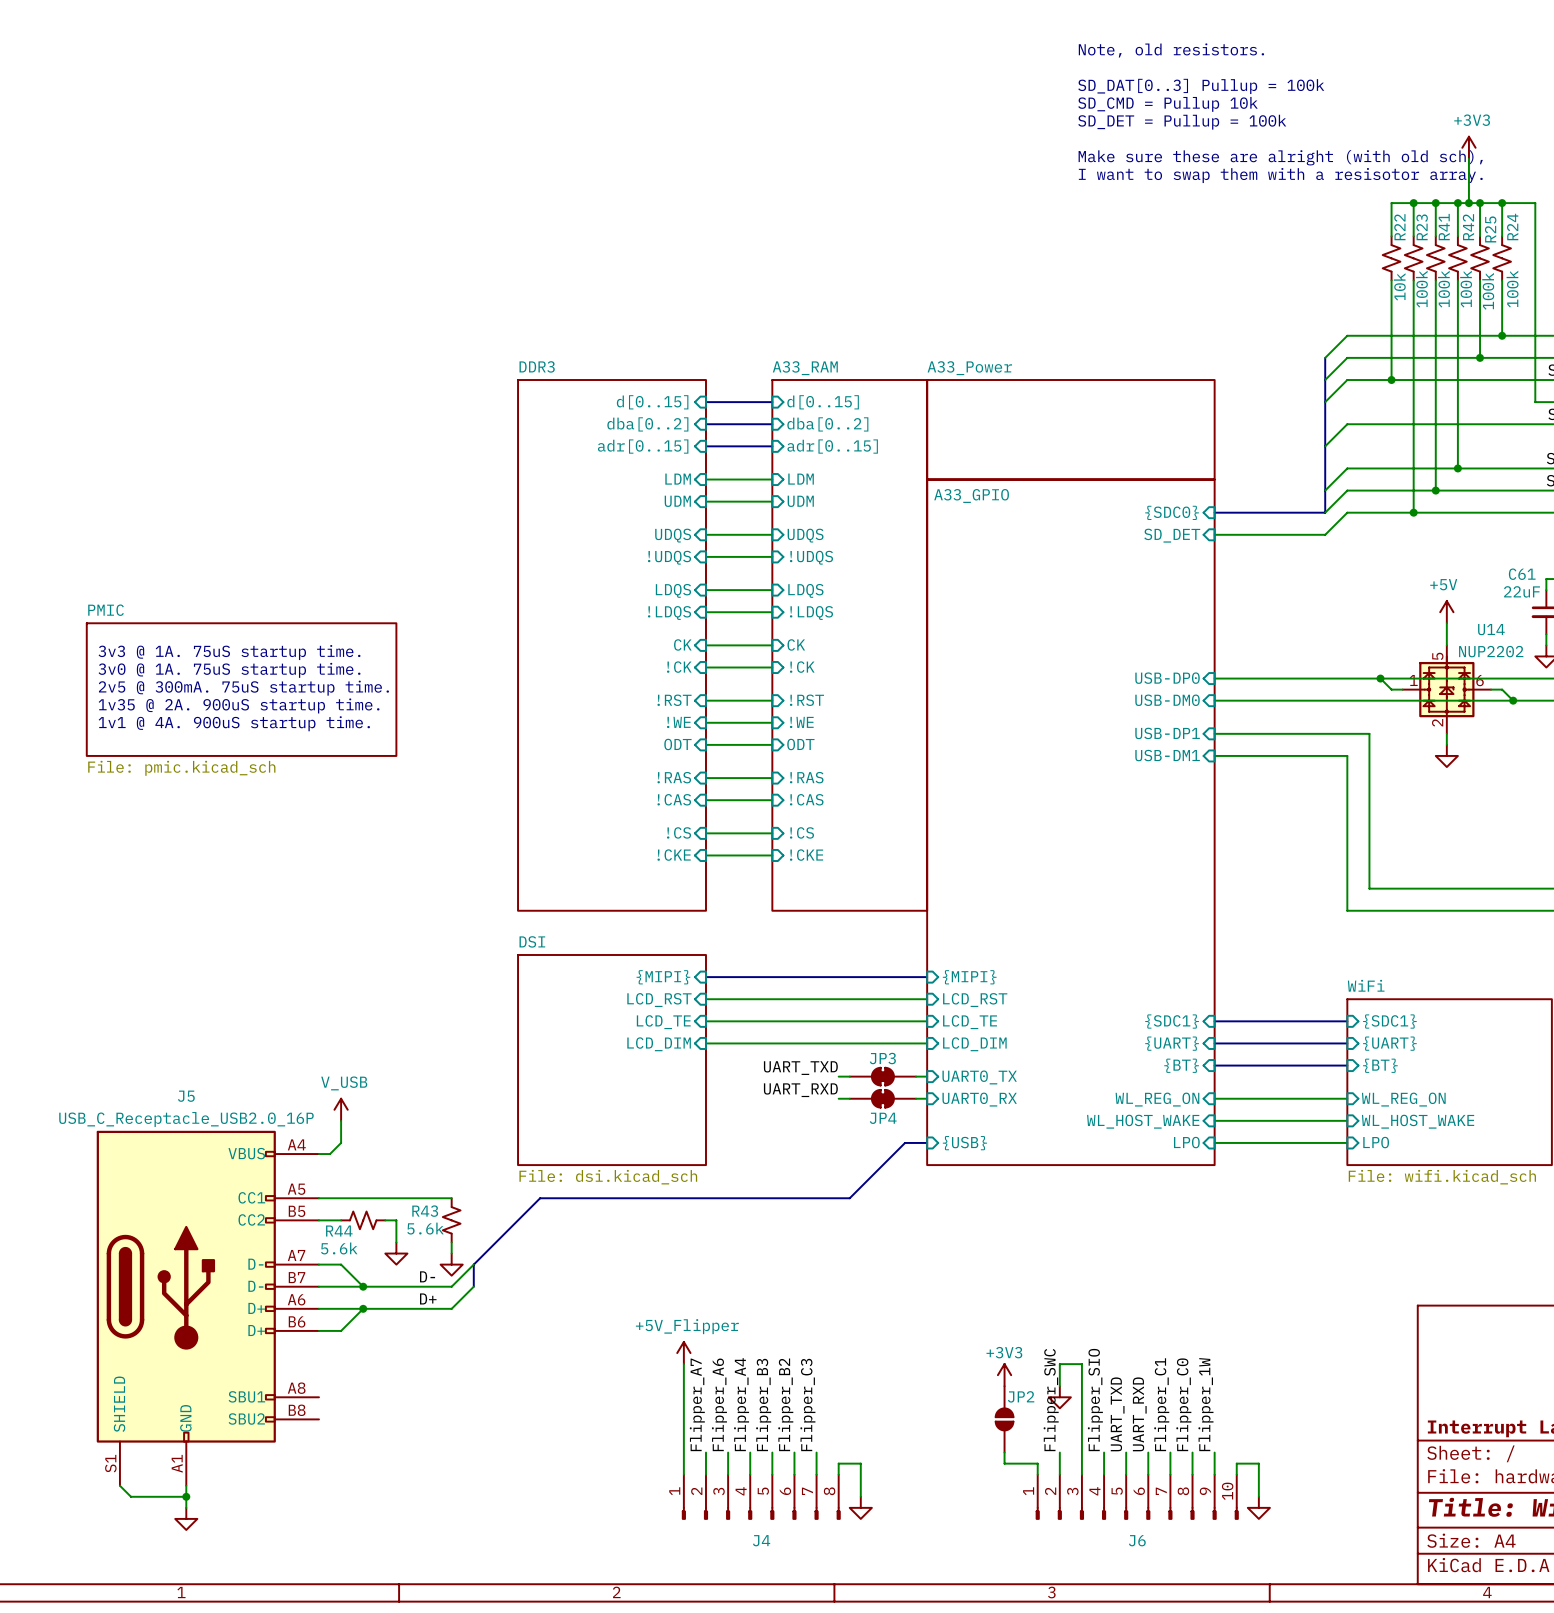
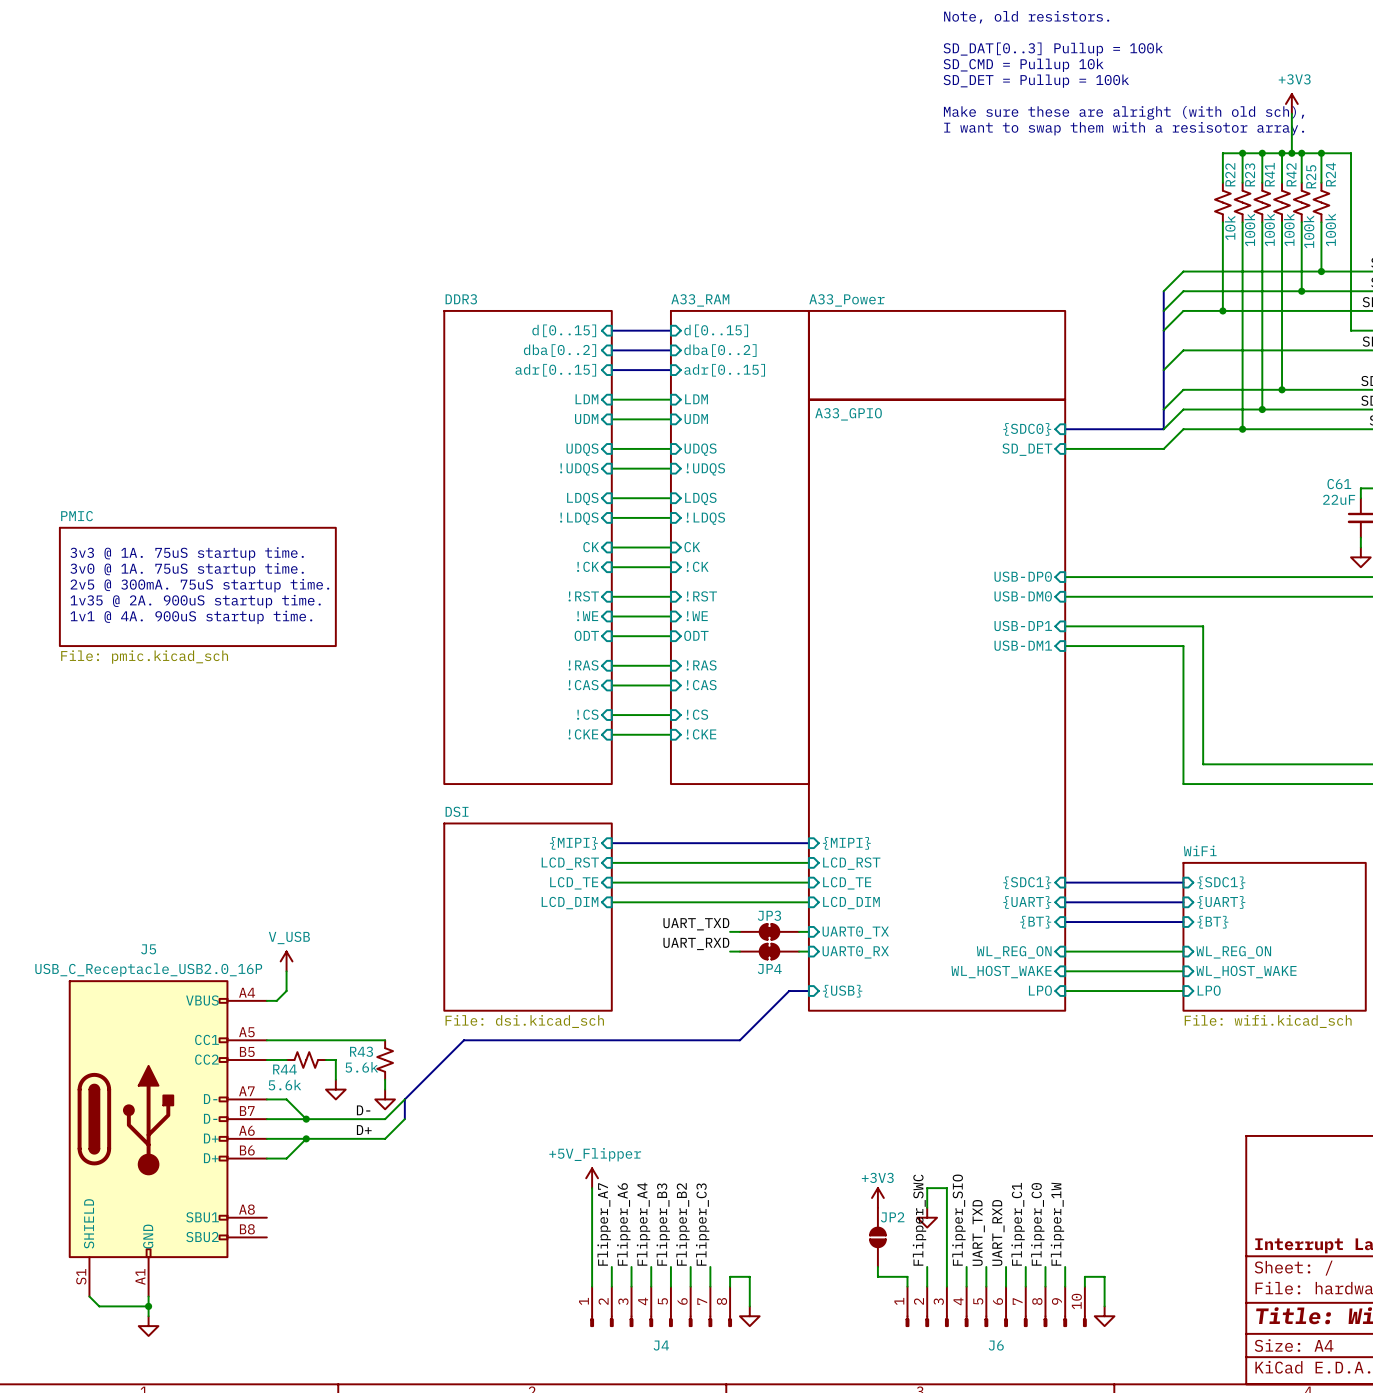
power symbol: +5V (1446, 612) -> none
wire: (1446, 623) (1446, 645) -> none
wire: (1380, 678) (1391, 689) (1402, 689) -> none
junction: (1380, 678) -> none
U14: NUP2202 (1446, 689) -> none
wire: (1491, 689) (1502, 689) (1513, 700) -> none
junction: (1513, 700) -> none
wire: (1446, 733) (1446, 744) -> none
power symbol: (1446, 755) -> none

